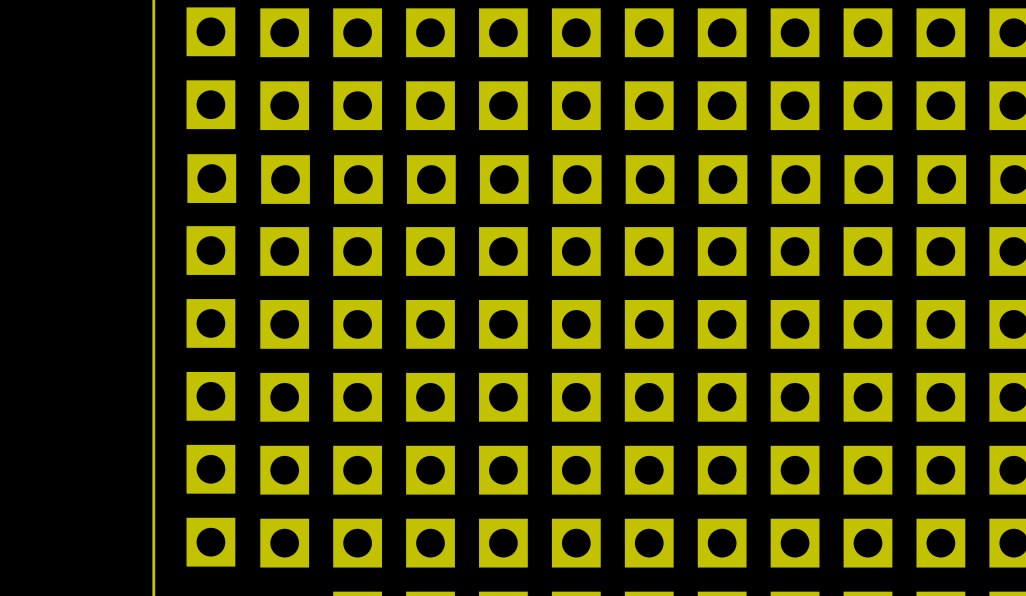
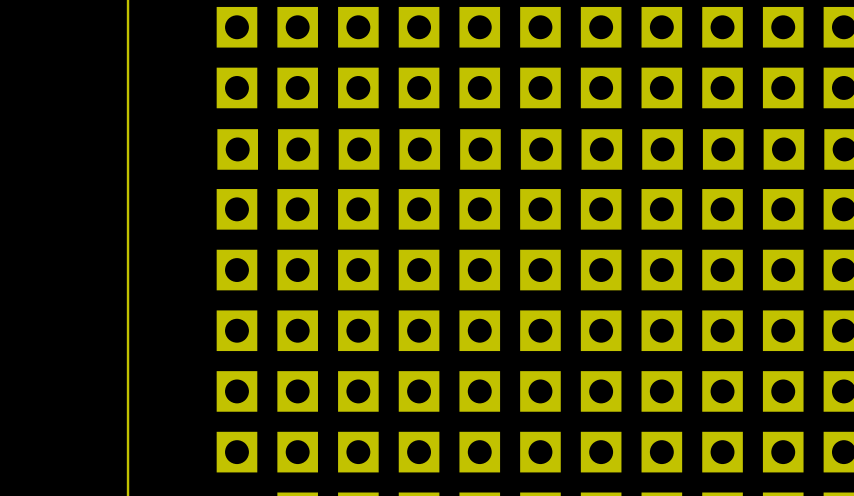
part: (210, 31) -> none
part: (210, 104) -> none
part: (211, 178) -> none
part: (210, 250) -> none
part: (210, 323) -> none
part: (210, 396) -> none
part: (210, 469) -> none
part: (210, 542) -> none

